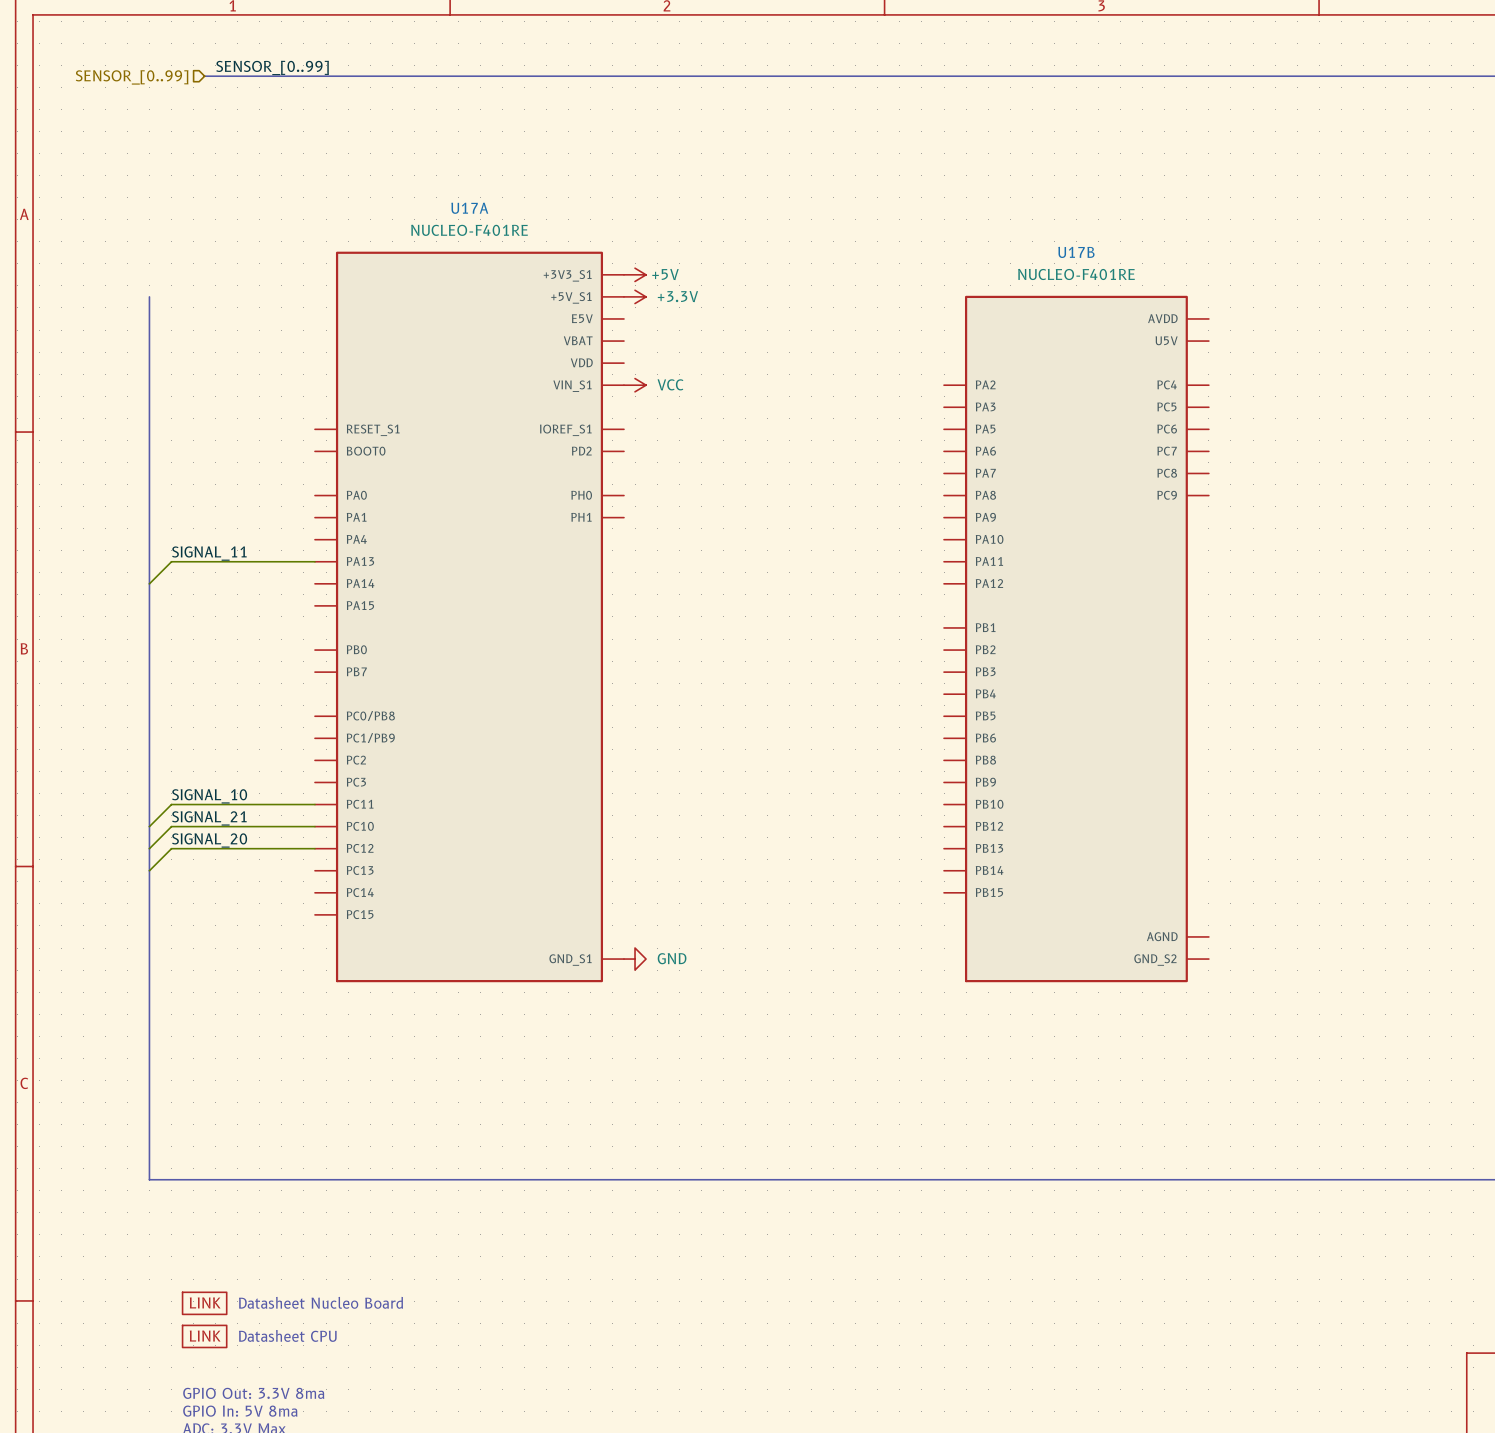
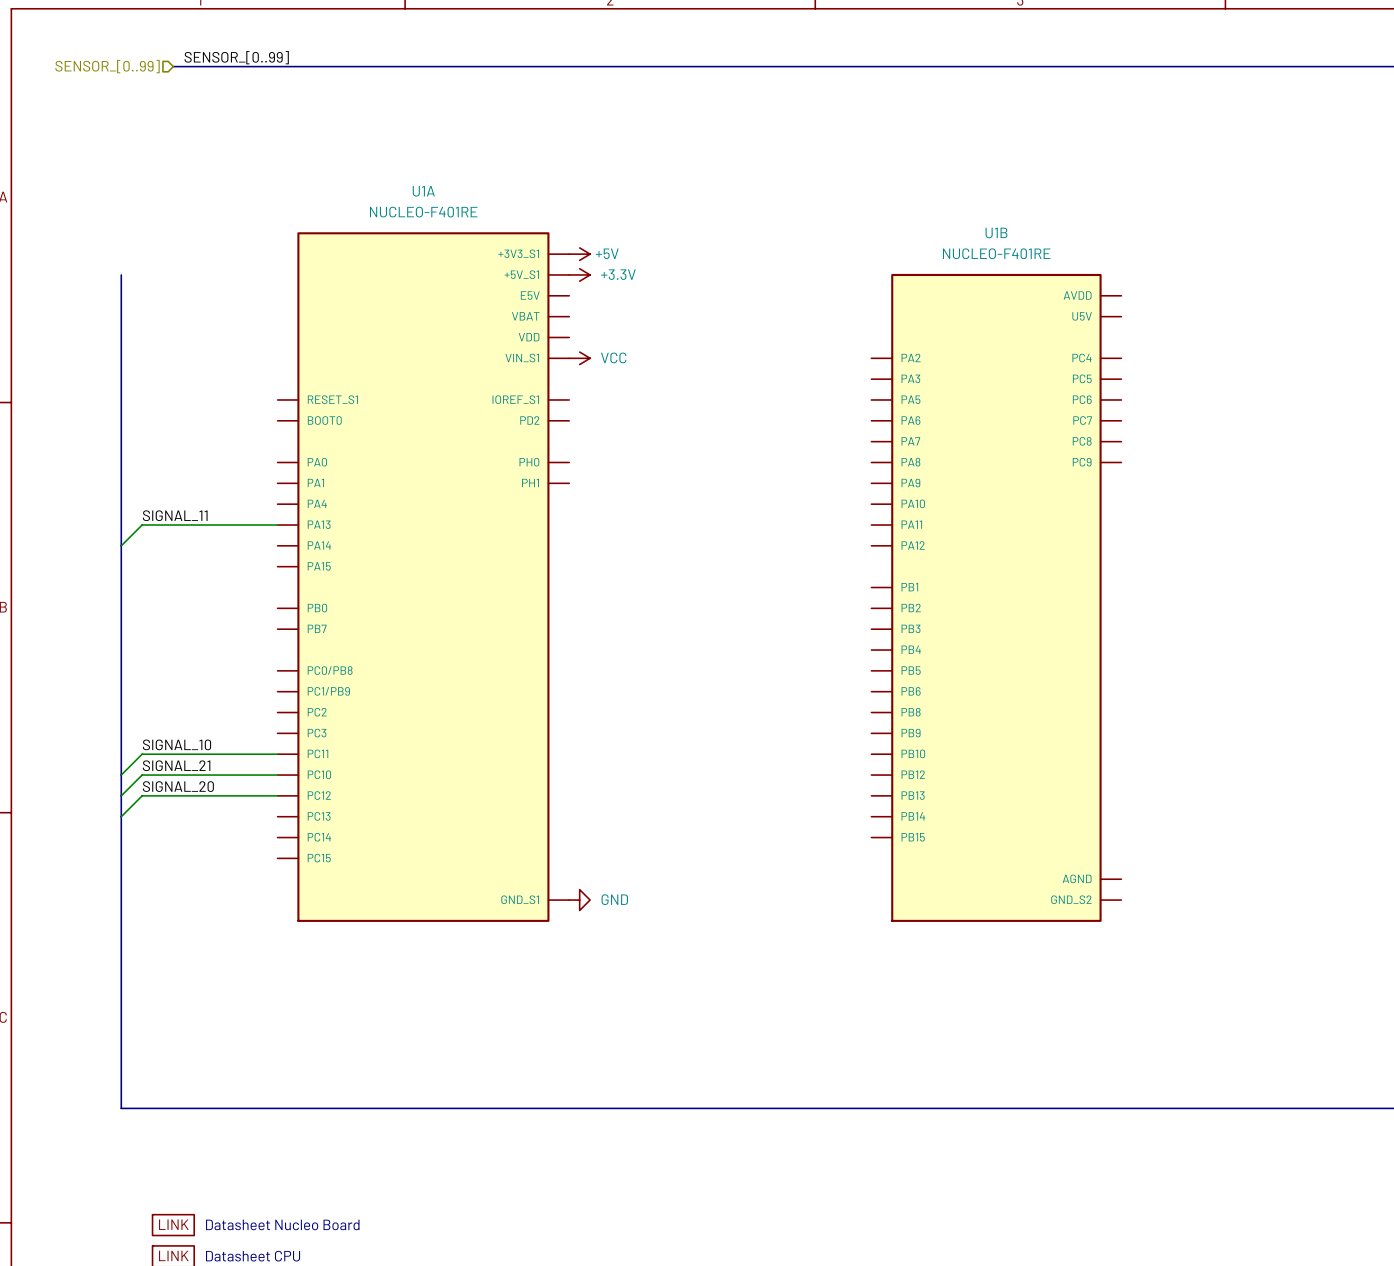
U17A name: U17A (469, 208) -> U1A (423, 191)
U17B name: U17B (1076, 252) -> U1B (996, 232)

